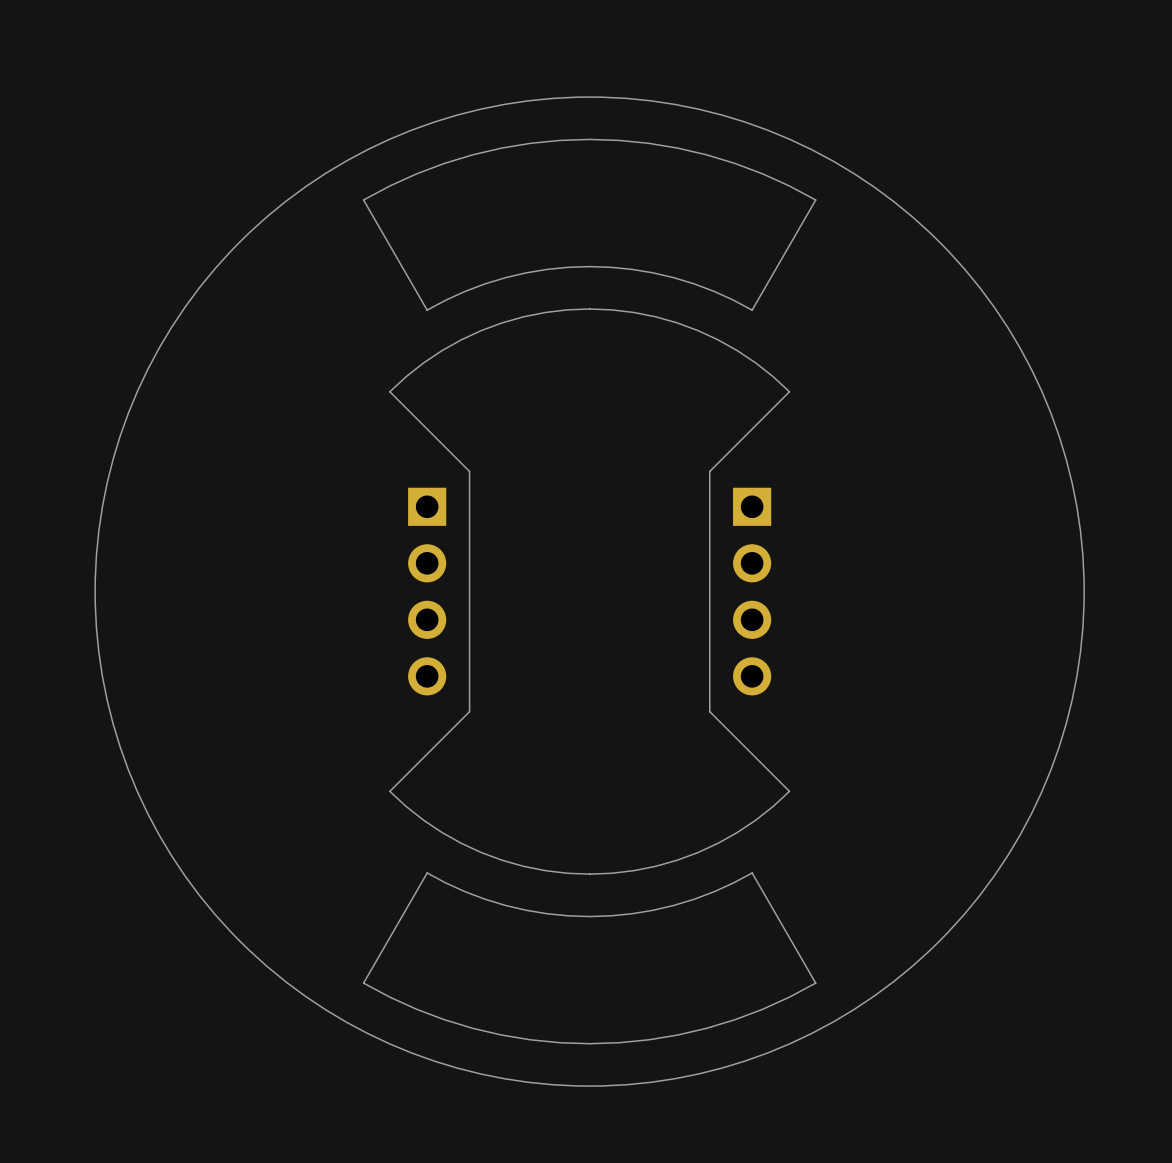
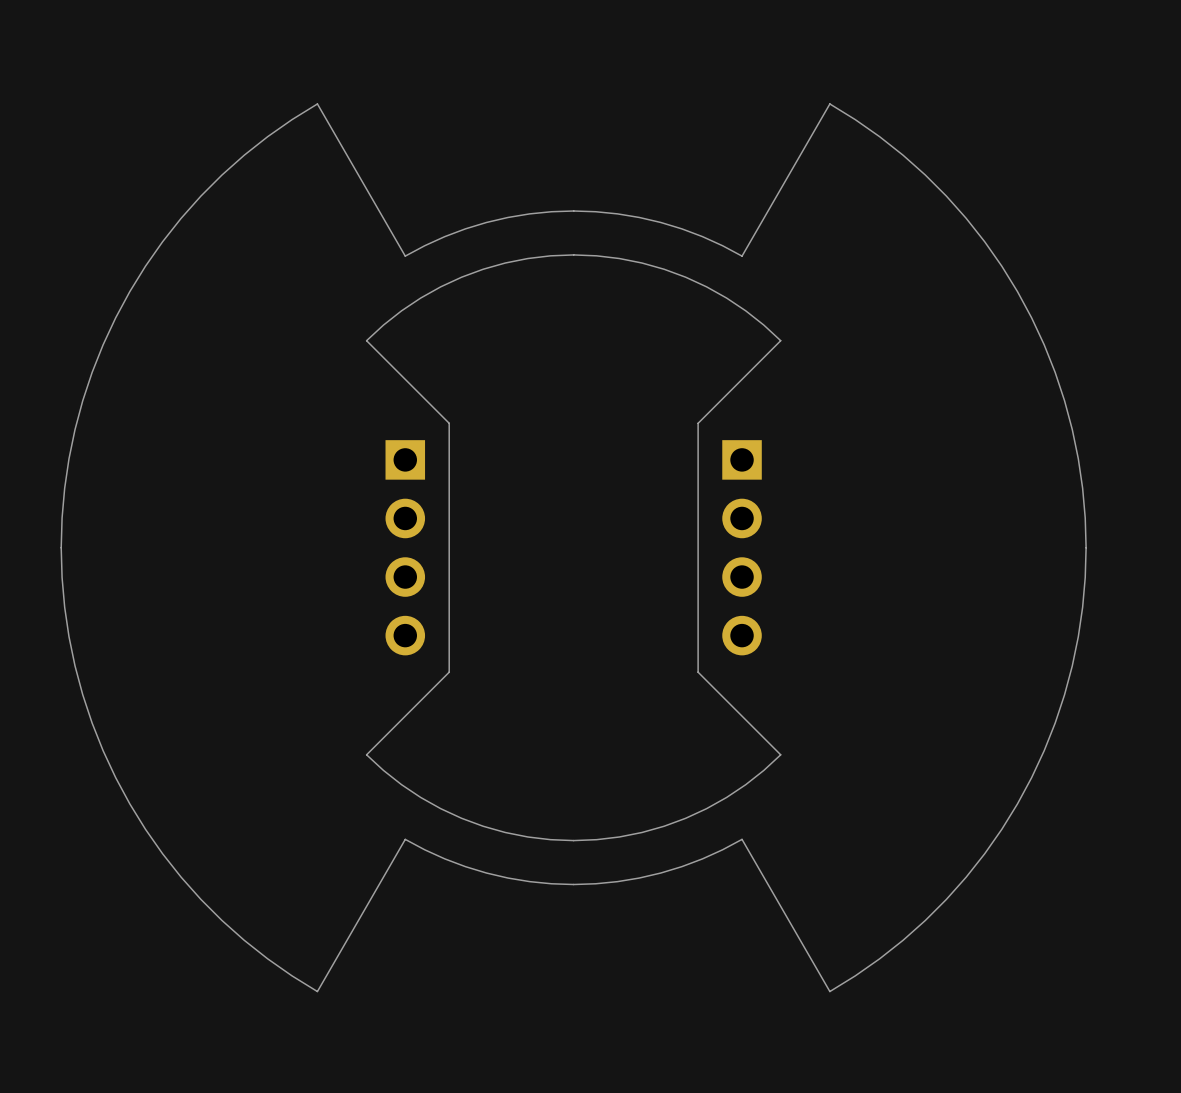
round board edge: [94, 96, 1085, 1087] -> none
board edge: (815, 200) (762, 173) (706, 154) (648, 143) (589, 139) (530, 143) (472, 154) (416, 173) (363, 200) -> (807, 142) (829, 103) (855, 119) (879, 136) (925, 175) (966, 218) (1001, 266) (1031, 317) (1055, 372) (1064, 400) (1078, 458) (1082, 488) (1086, 547) (1082, 607) (1078, 636) (1064, 694) (1044, 750) (1017, 803) (1001, 829) (966, 877) (925, 920) (903, 940) (855, 975) (829, 991) (807, 953)
board edge: (815, 983) (762, 1009) (706, 1028) (648, 1039) (589, 1043) (530, 1039) (472, 1028) (416, 1009) (363, 983) -> (339, 142) (317, 103) (292, 119) (244, 155) (221, 175) (181, 218) (145, 266) (115, 317) (92, 372) (82, 400) (75, 429) (64, 488) (61, 547) (64, 607) (75, 665) (82, 694) (103, 750) (129, 803) (145, 829) (181, 877) (221, 920) (244, 940) (292, 975) (317, 991) (339, 953)

